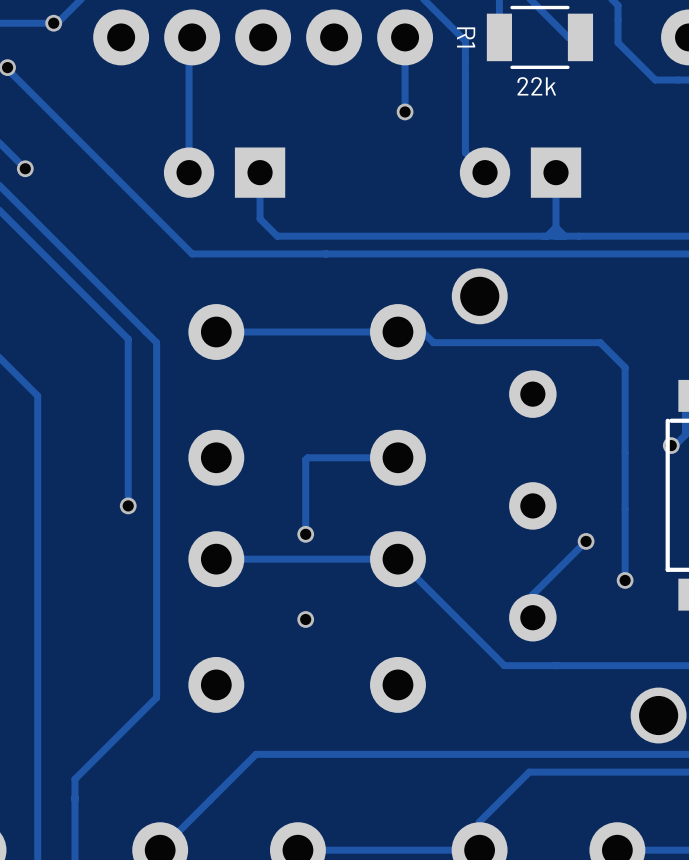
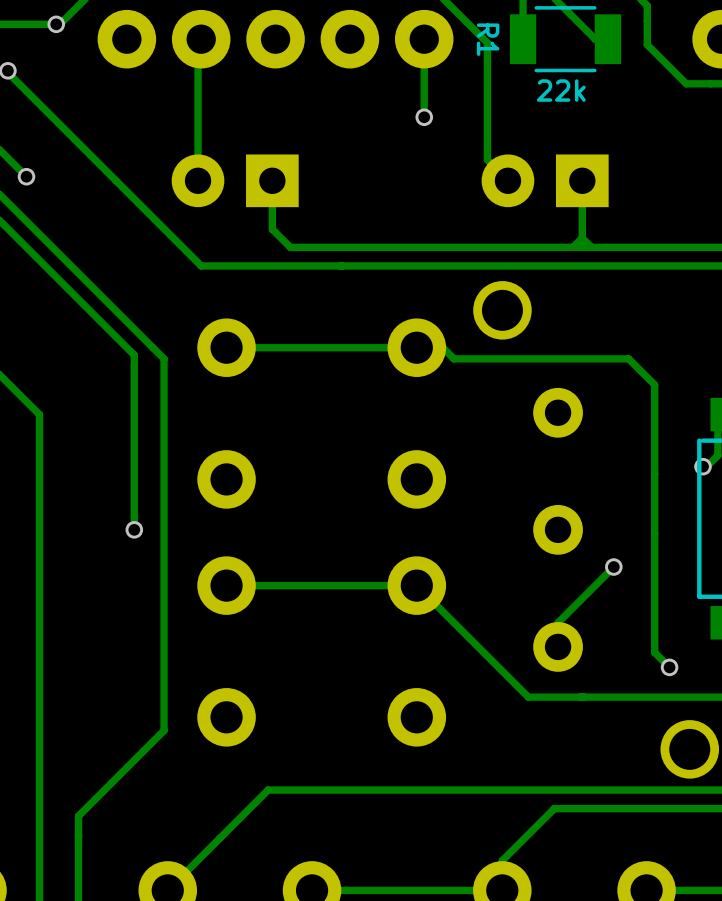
track: (397, 457) (307, 457) (305, 459) (305, 534) -> none
via: (305, 534) -> none
track: none -> (654, 607) (654, 652) (669, 667)
via position: (625, 580) -> (669, 667)
via: (305, 619) -> none

